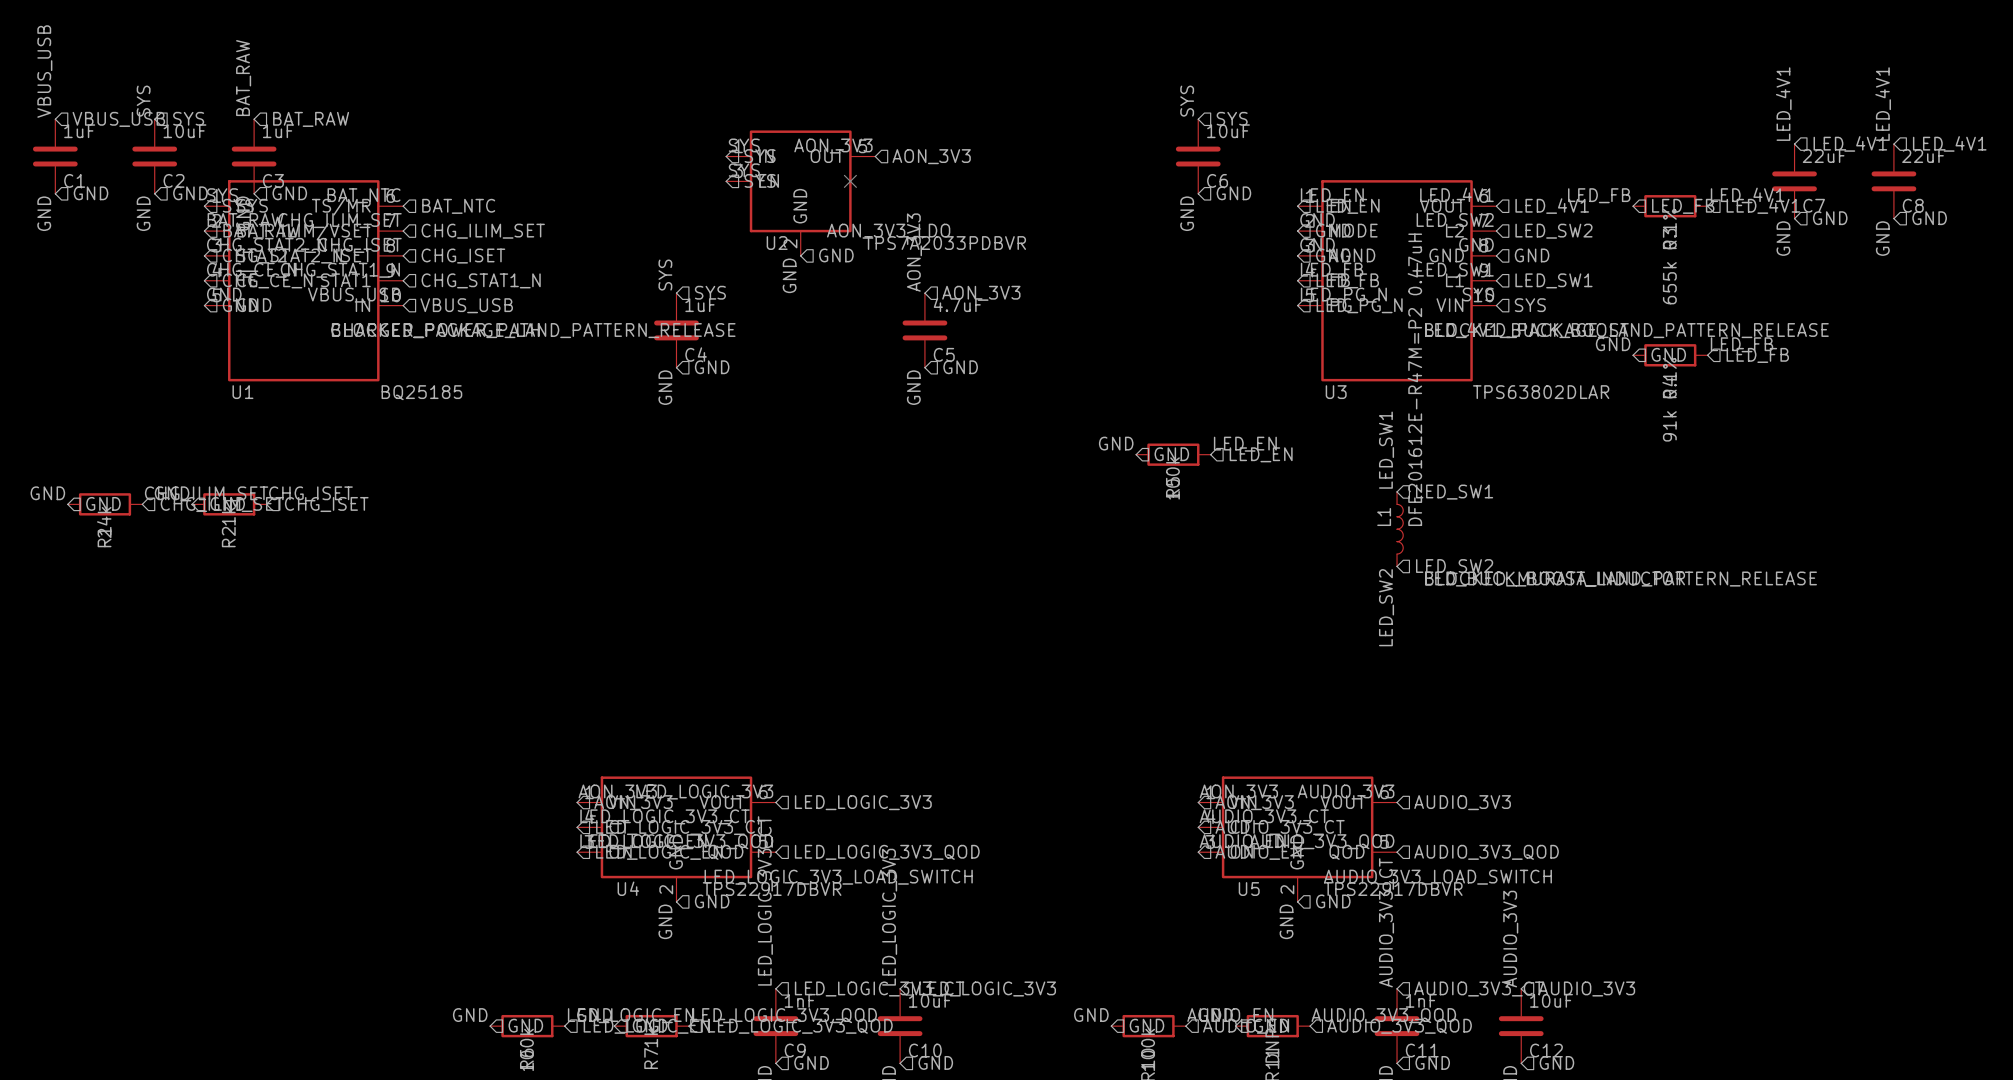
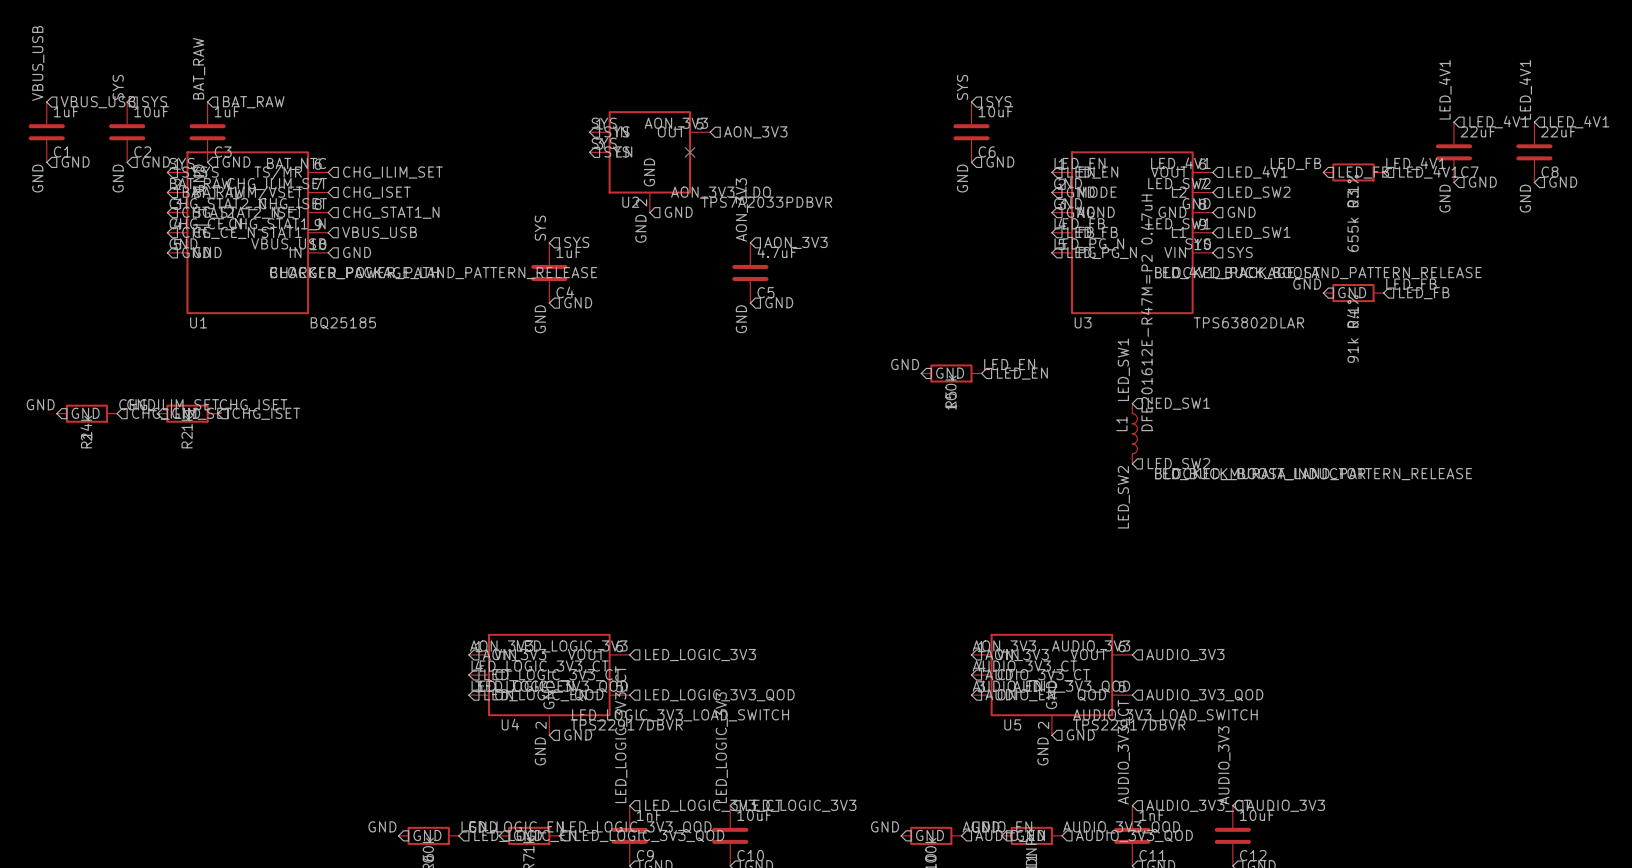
hierarchical label: BAT_NTC (458, 206) -> CHG_ILIM_SET (392, 172)
hierarchical label: CHG_ILIM_SET (483, 231) -> CHG_ISET (376, 192)
hierarchical label: CHG_ISET (463, 256) -> CHG_STAT1_N (391, 212)
hierarchical label: CHG_STAT1_N (481, 280) -> VBUS_USB (379, 232)
hierarchical label: VBUS_USB (466, 305) -> GND (357, 252)

